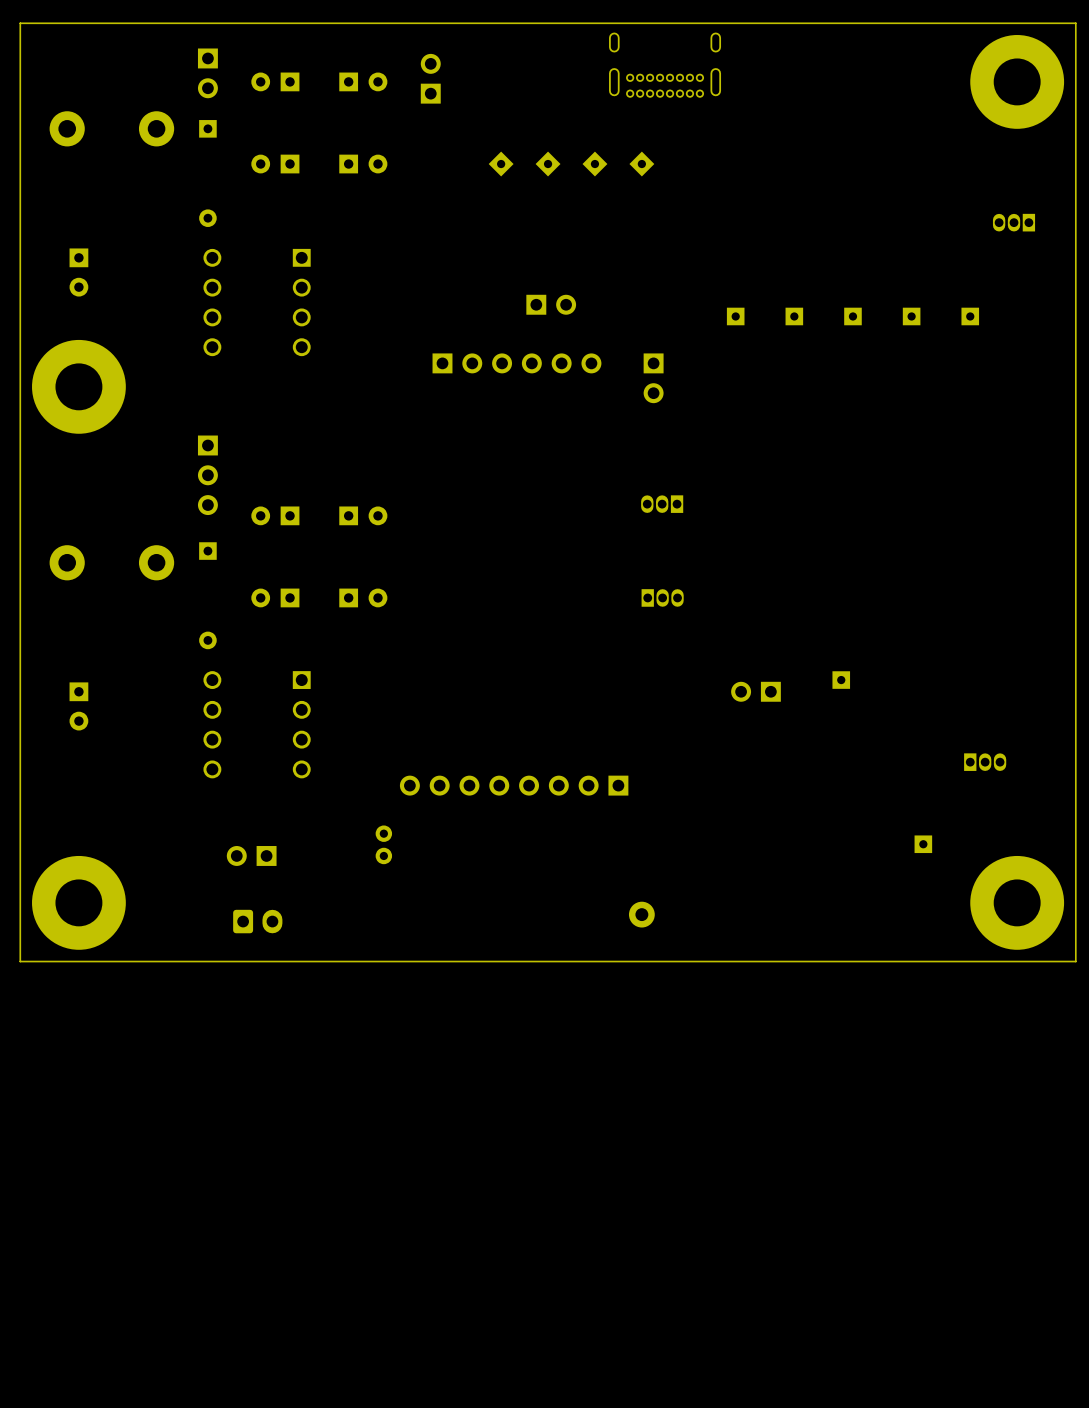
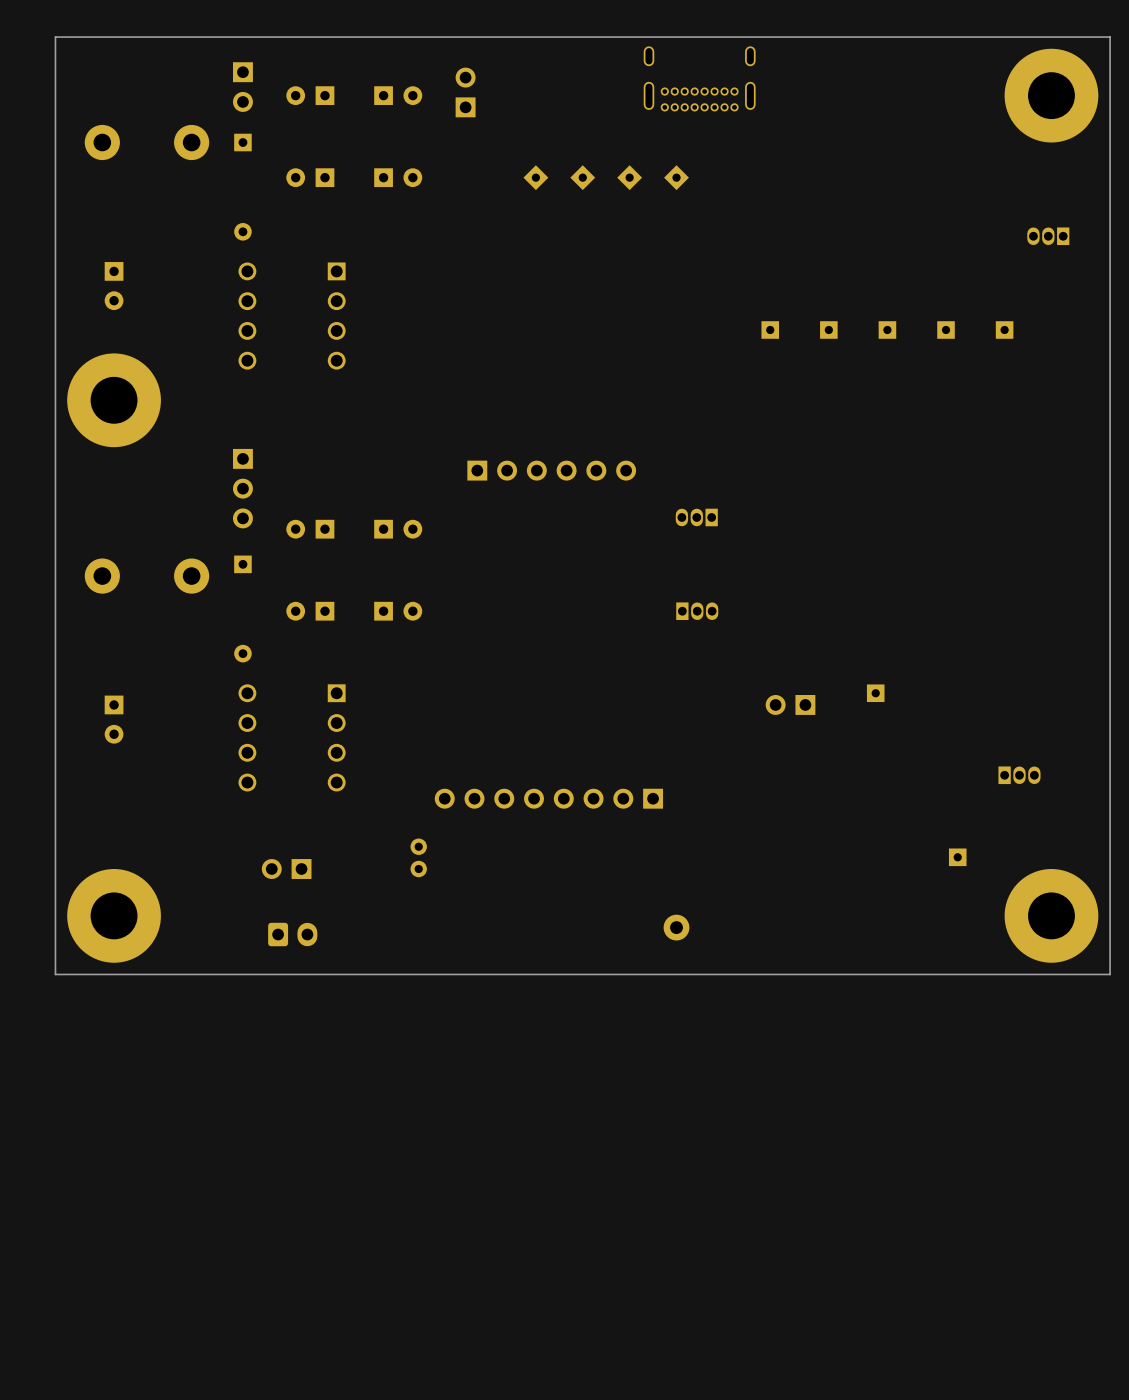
part: (551, 304) -> none
part position: (516, 363) -> (551, 470)
part: (653, 378) -> none

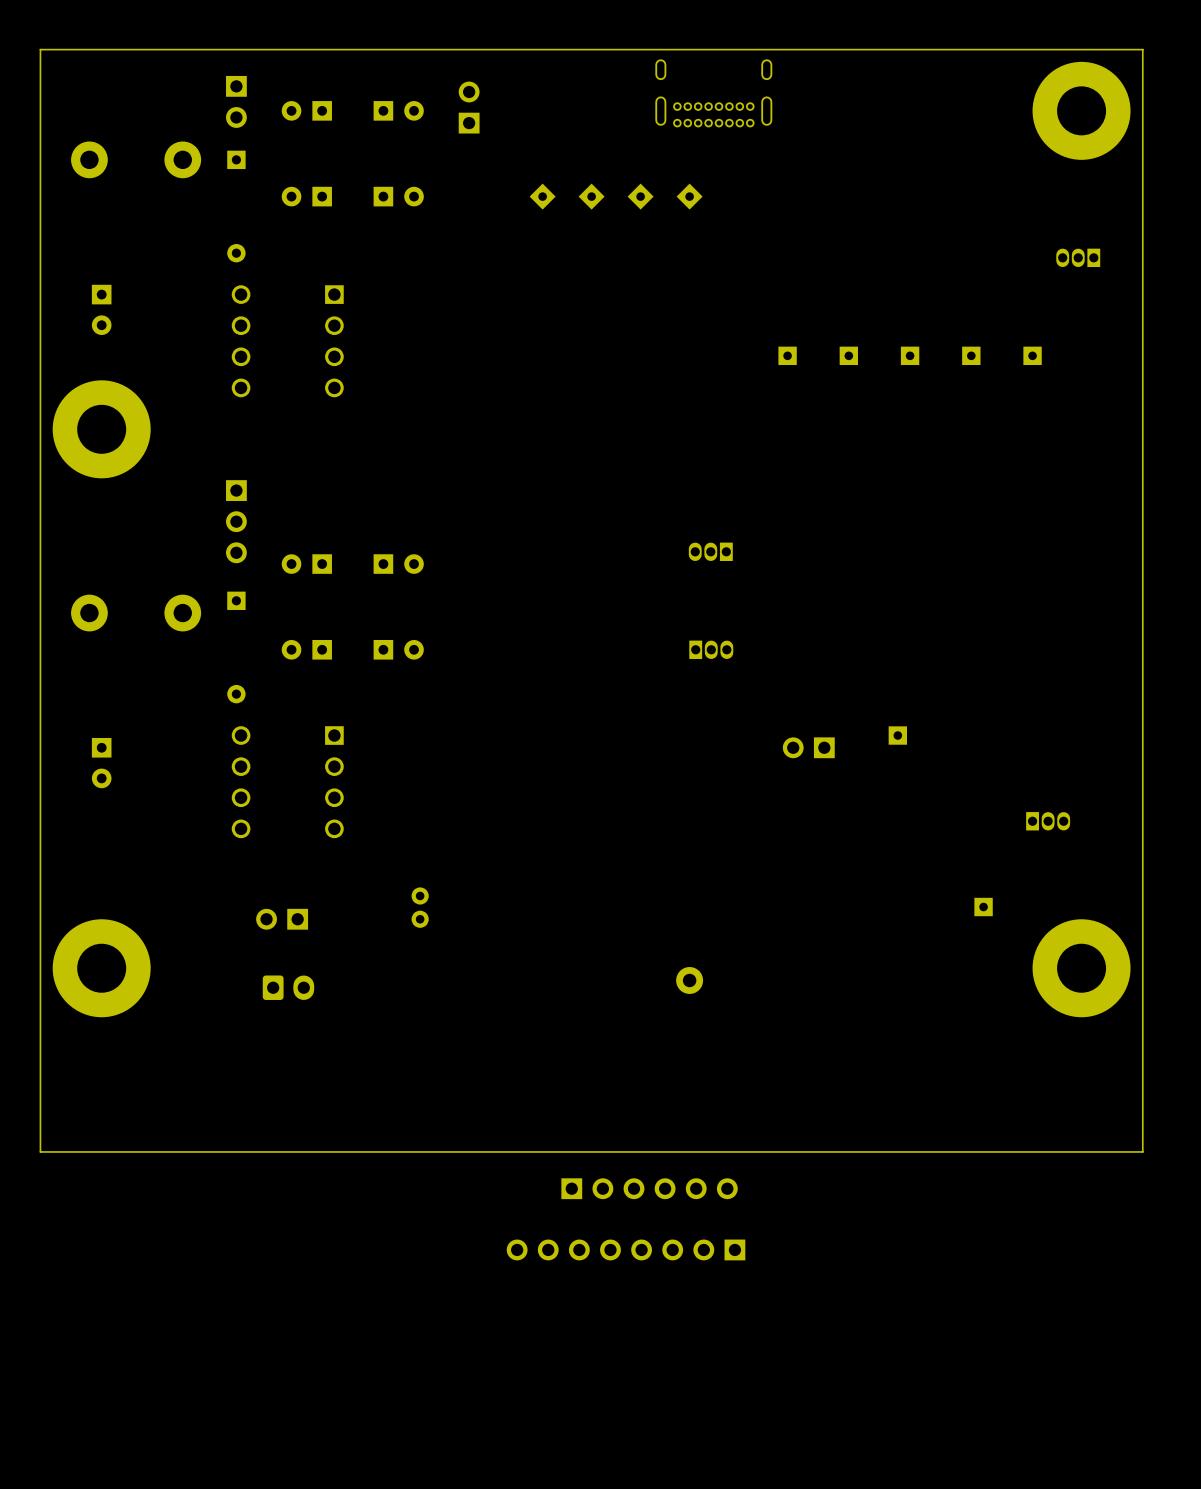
part: (551, 470) -> none
part: (548, 798) -> none
board edge: (1110, 974) (55, 974) -> (1142, 1029) (1142, 1151) (40, 1151) (40, 1029)
part: none -> (649, 1188)
part: none -> (626, 1249)

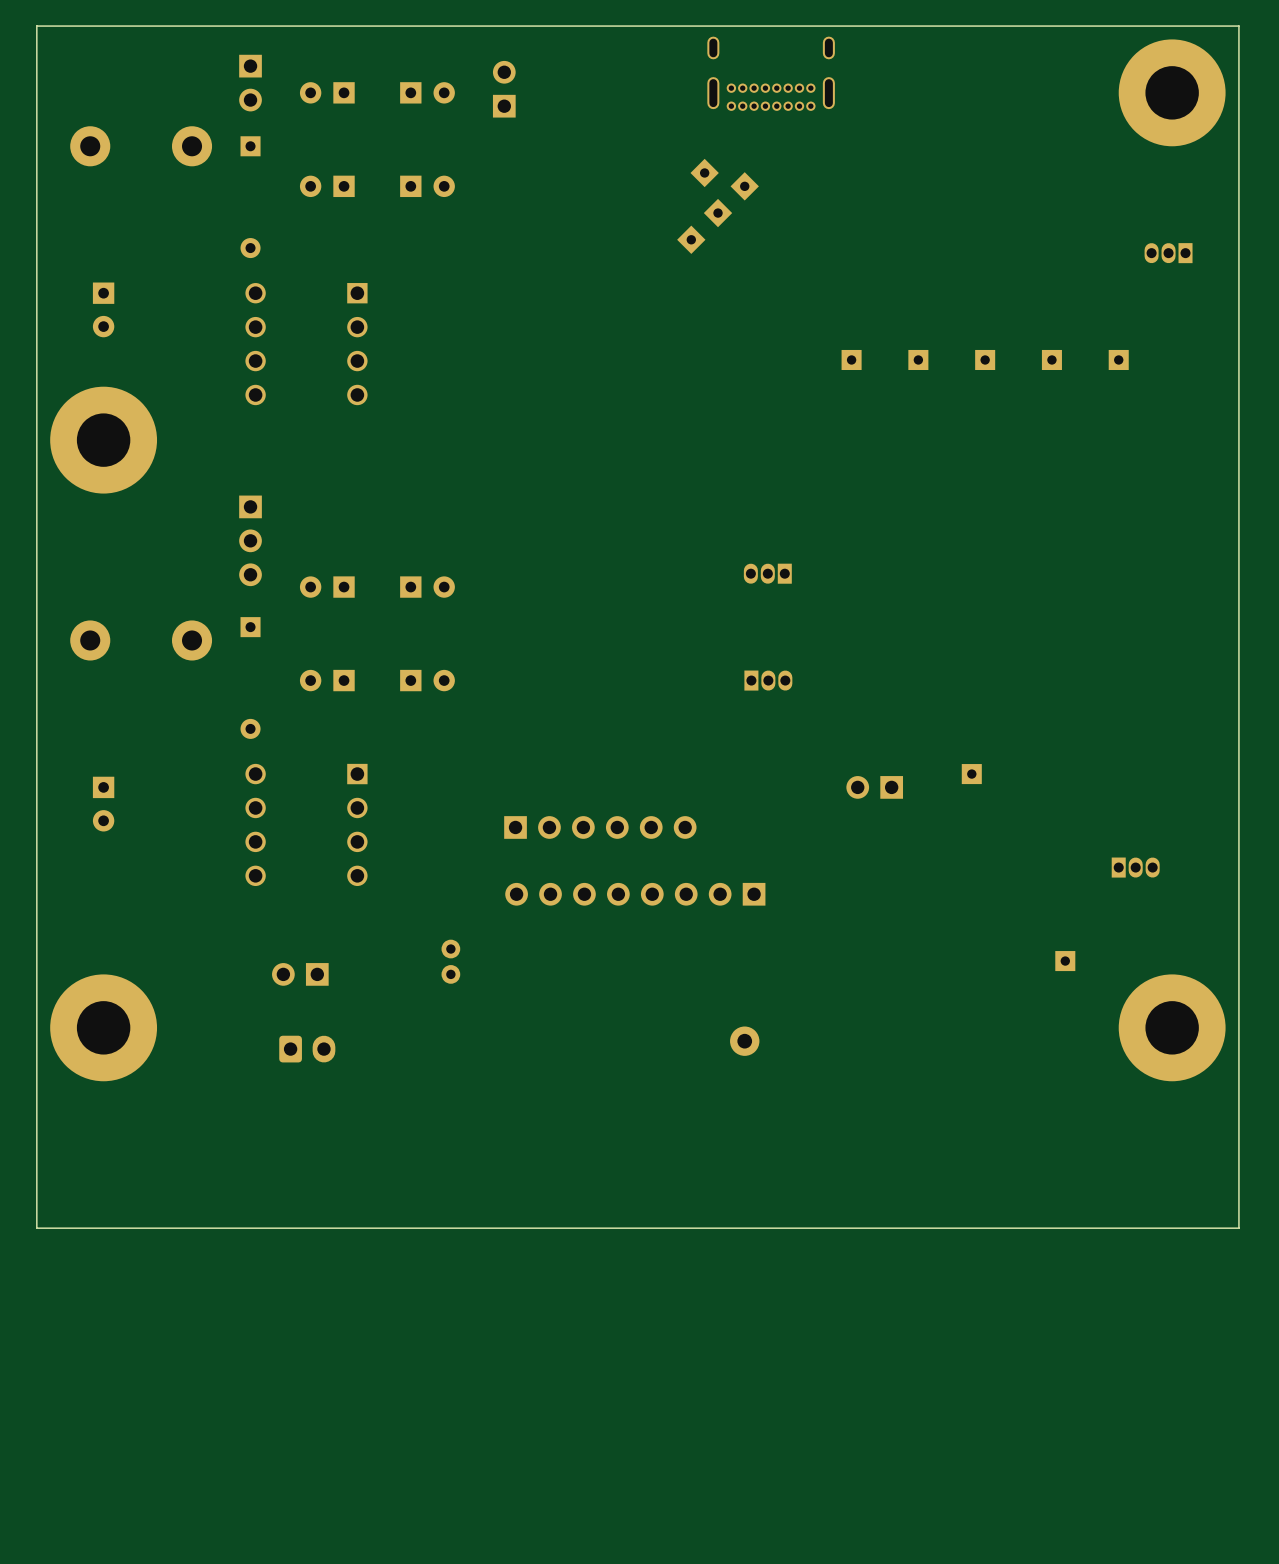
part: none -> (704, 172)
part: (542, 196) -> none
part: (591, 196) -> none
part: (640, 196) -> none
part: none -> (718, 213)
part: none -> (691, 239)
part: none -> (600, 827)
part: none -> (635, 894)
part: (649, 1188) -> none
part: (626, 1249) -> none

